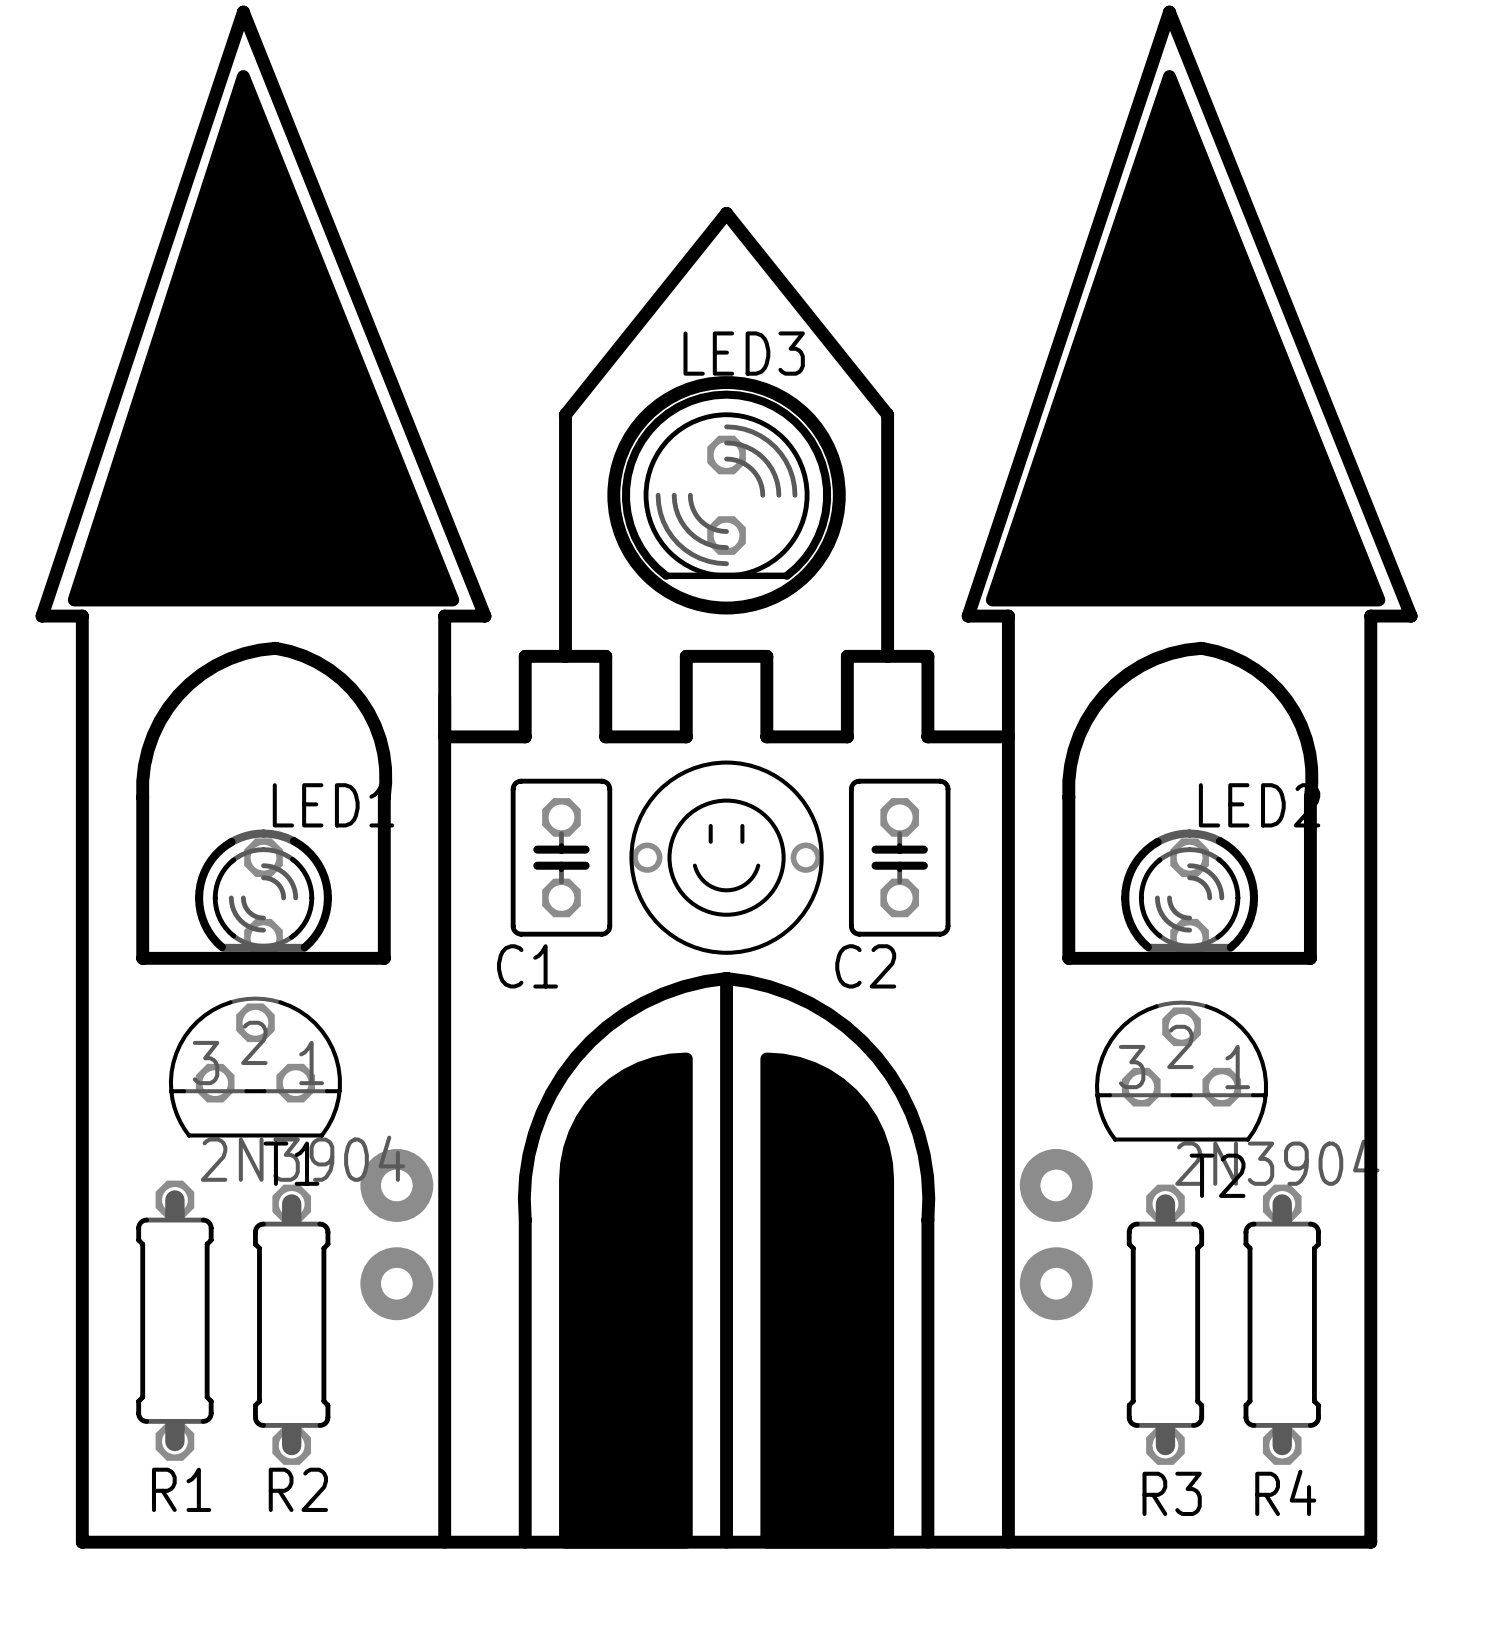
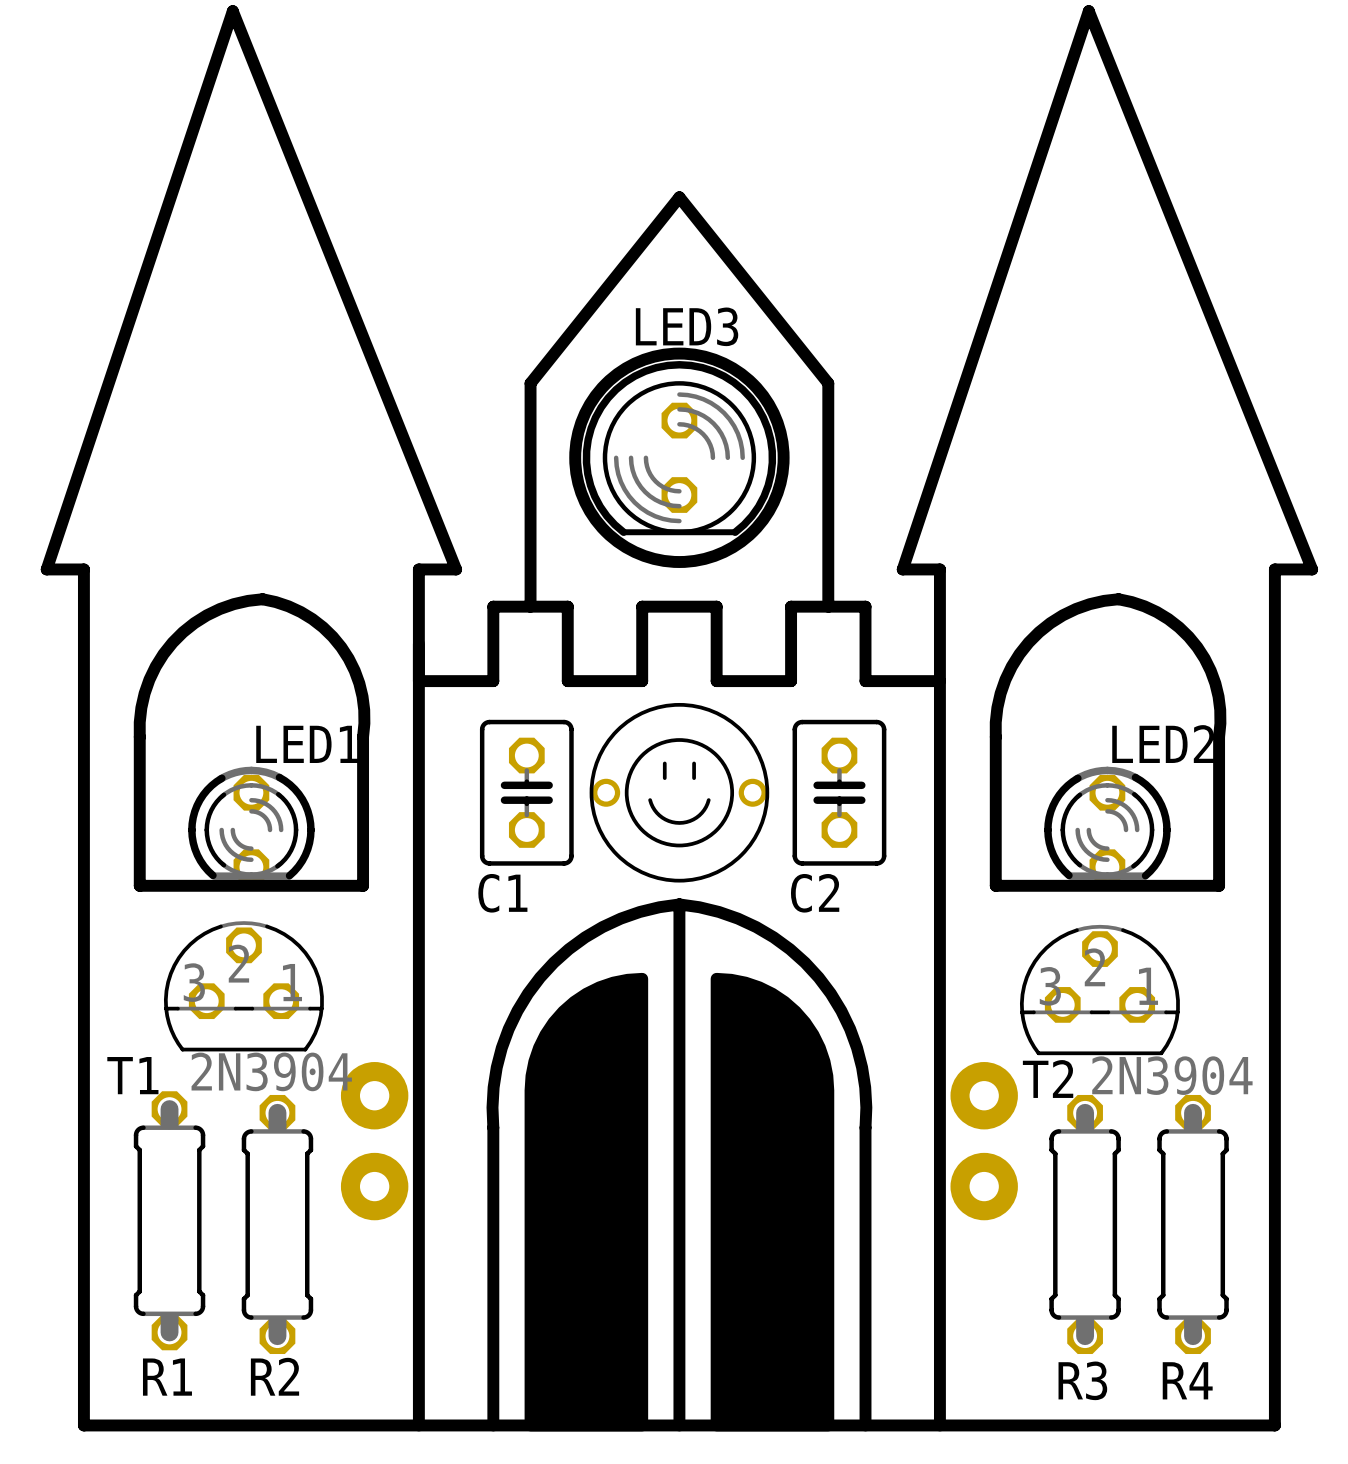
drawing: [67, 70, 460, 607] -> none
drawing: [985, 70, 1386, 607] -> none
T1 name position: T1 (291, 1163) -> T1 (132, 1075)
T2 name position: T2 (1217, 1175) -> T2 (1048, 1079)

